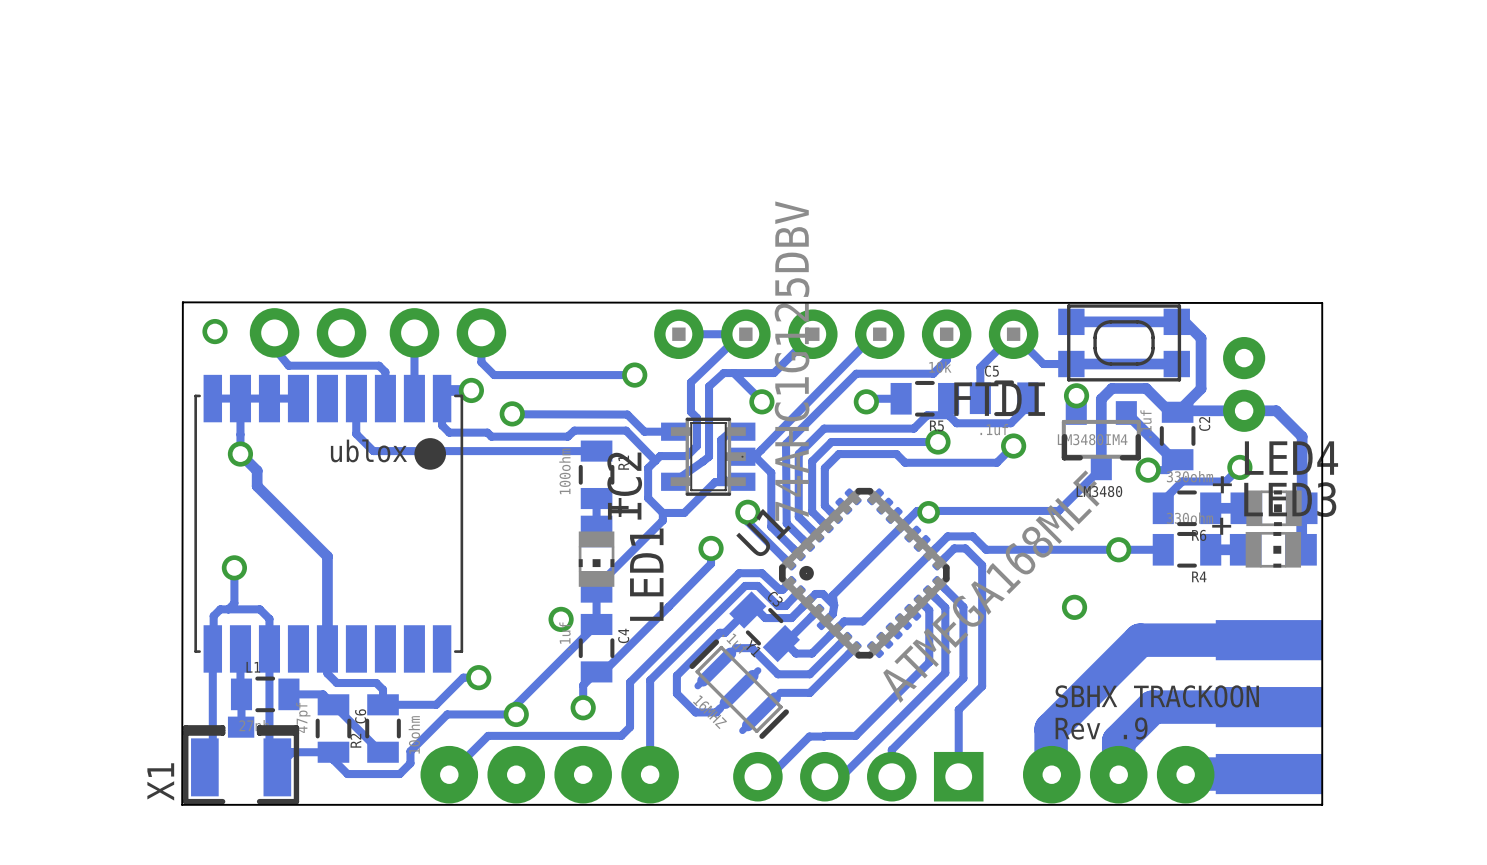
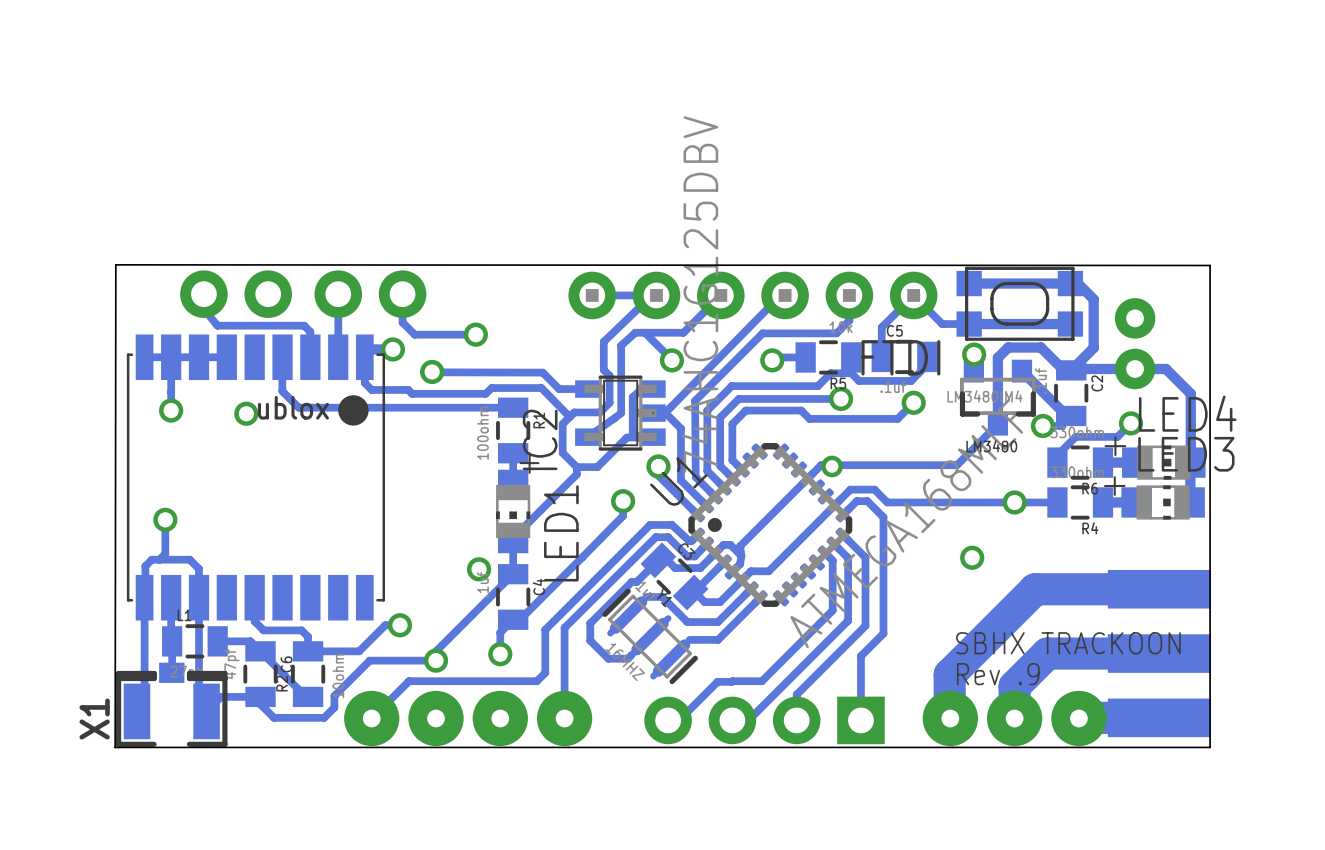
via: (215, 331) -> none
track: (634, 375) (557, 375) -> none
via position: (634, 375) -> (475, 334)
track: (240, 454) (257, 470) (257, 486) (327, 556) (327, 648) -> none
via: none -> (246, 413)

